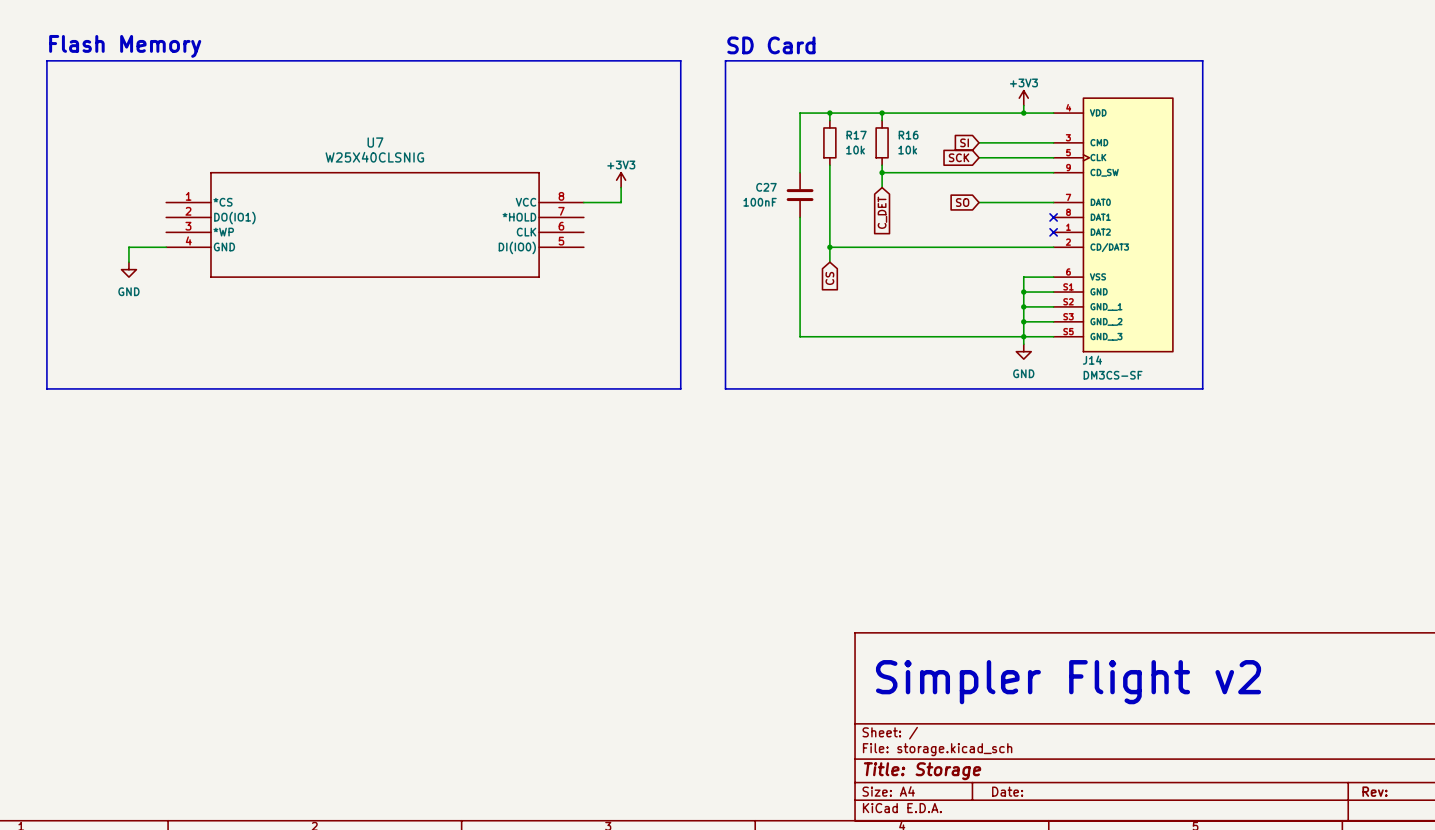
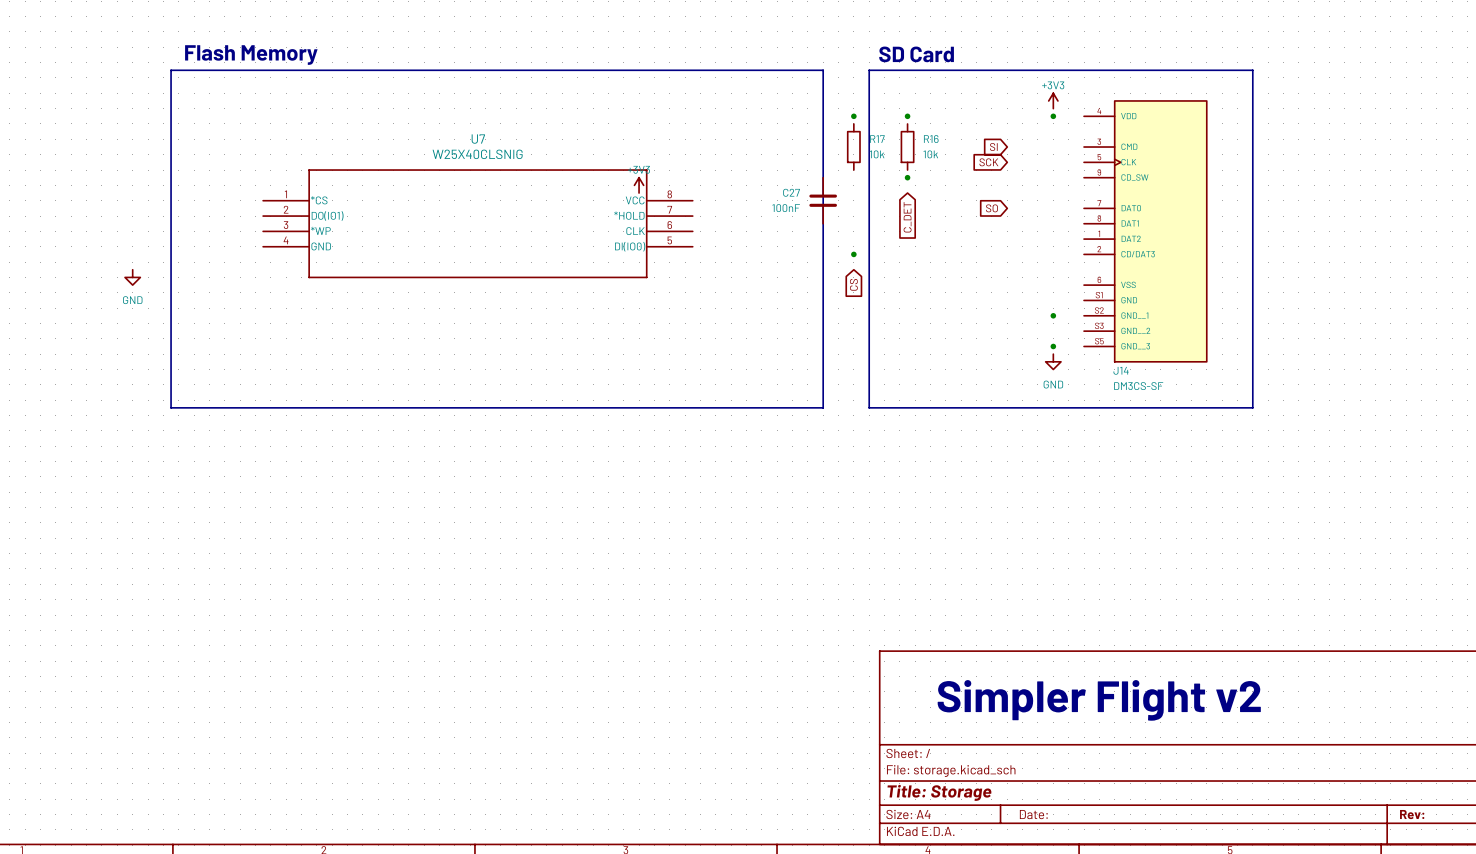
text position: SD Card (771, 45) -> SD Card (916, 54)
text position: Flash Memory (125, 46) -> Flash Memory (251, 55)
line: (46, 60) (680, 60) (680, 388) (46, 388) (46, 60) -> (171, 70) (823, 70) (823, 407) (171, 407) (171, 70)
line: (725, 60) (1202, 60) (1202, 388) (725, 388) (725, 60) -> (869, 70) (869, 407) (1252, 407) (1252, 70) (869, 70)
wire: (1023, 105) (1023, 113) -> none
wire: (829, 113) (829, 120) -> none
wire: (882, 113) (882, 120) -> none
wire: (1053, 113) (800, 113) (800, 172) -> none
wire: (979, 142) (1053, 142) -> none
wire: (979, 157) (1053, 157) -> none
wire: (829, 165) (829, 262) -> none
wire: (882, 165) (882, 187) -> none
wire: (882, 172) (1053, 172) -> none
wire: (621, 187) (621, 202) (583, 202) -> none
wire: (979, 202) (1053, 202) -> none
wire: (800, 217) (800, 336) (1053, 336) -> none
no-connect mark: (1053, 217) -> none
U7 position: (375, 224) -> (477, 223)
no-connect mark: (1053, 232) -> none
wire: (166, 247) (128, 247) (128, 262) -> none
wire: (829, 247) (1053, 247) -> none
wire: (1053, 277) (1023, 277) (1023, 344) -> none
wire: (1023, 292) (1053, 292) -> none
junction: (1023, 292) -> none
wire: (1023, 306) (1053, 306) -> none
wire: (1023, 321) (1053, 321) -> none
junction: (1023, 321) -> none

